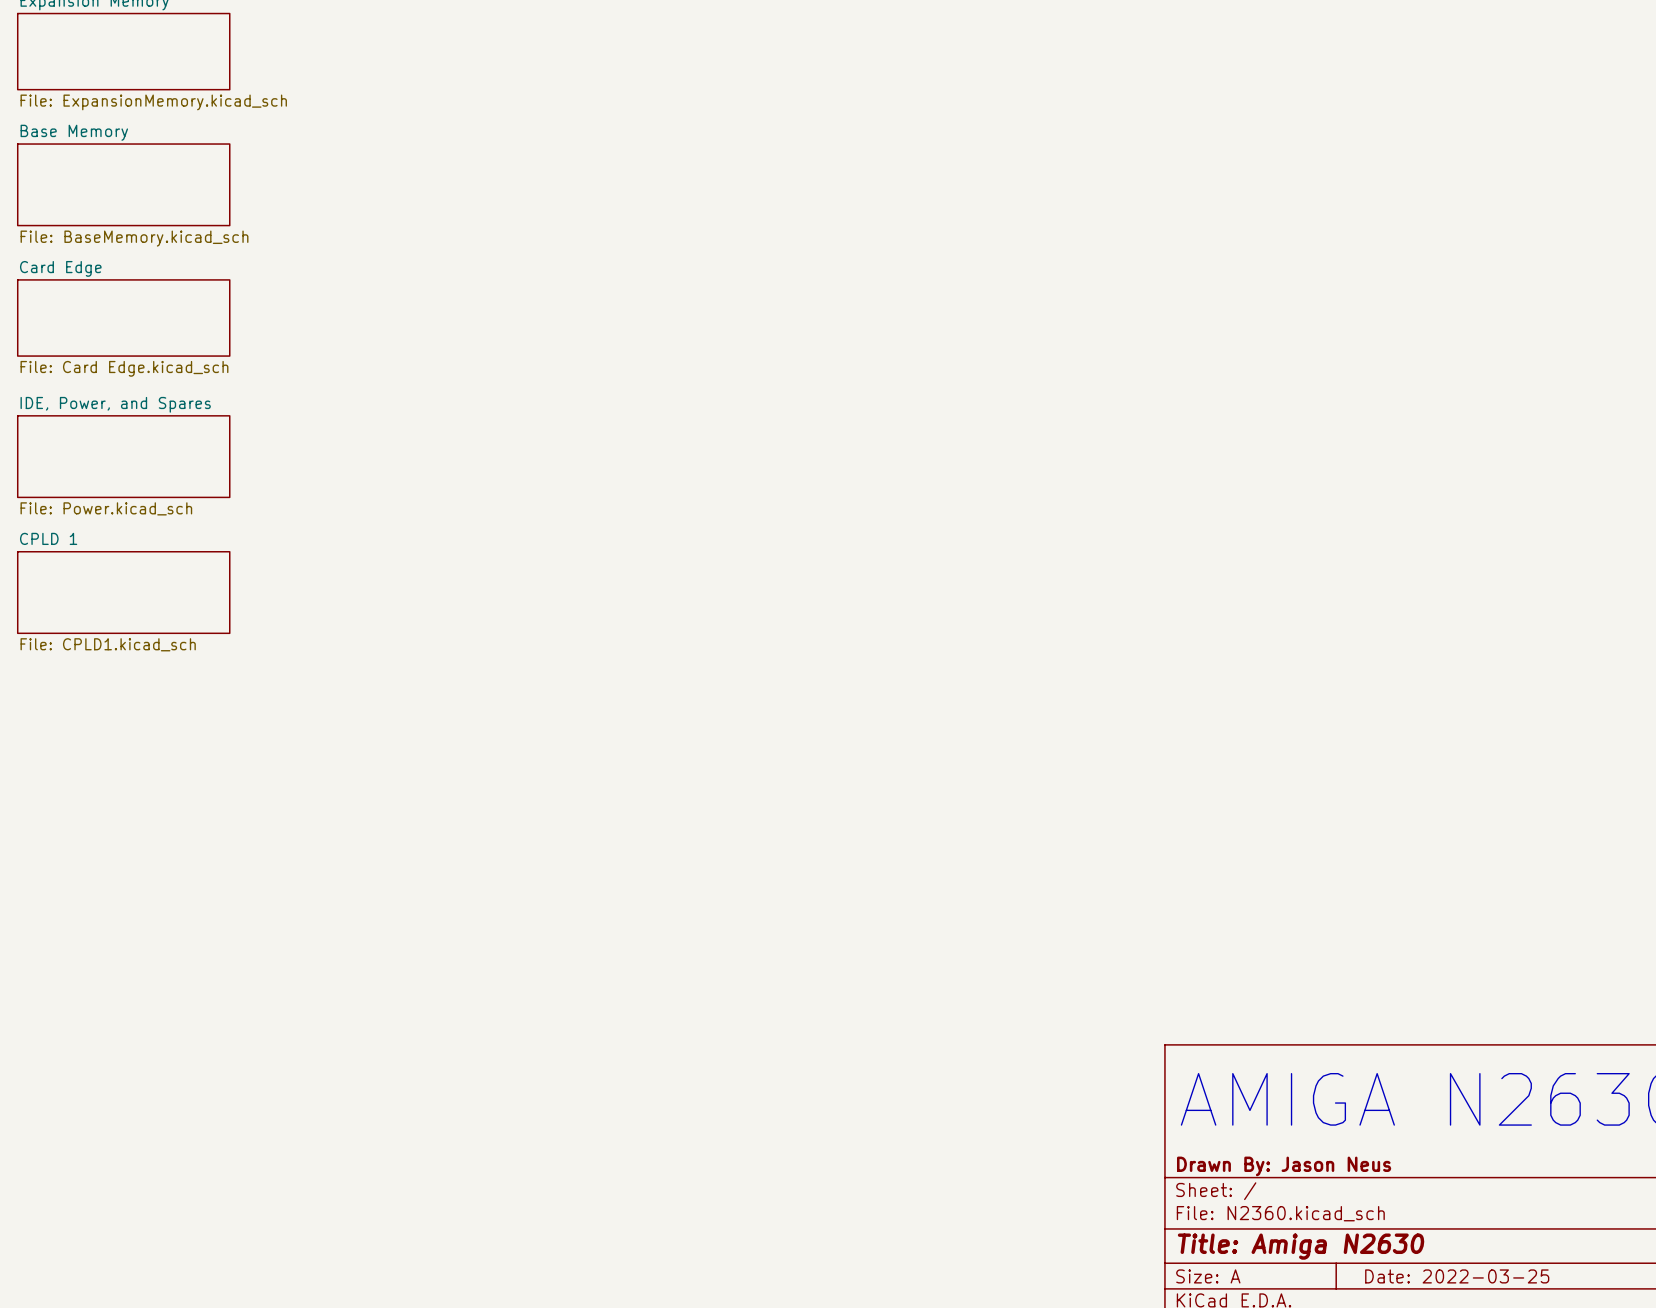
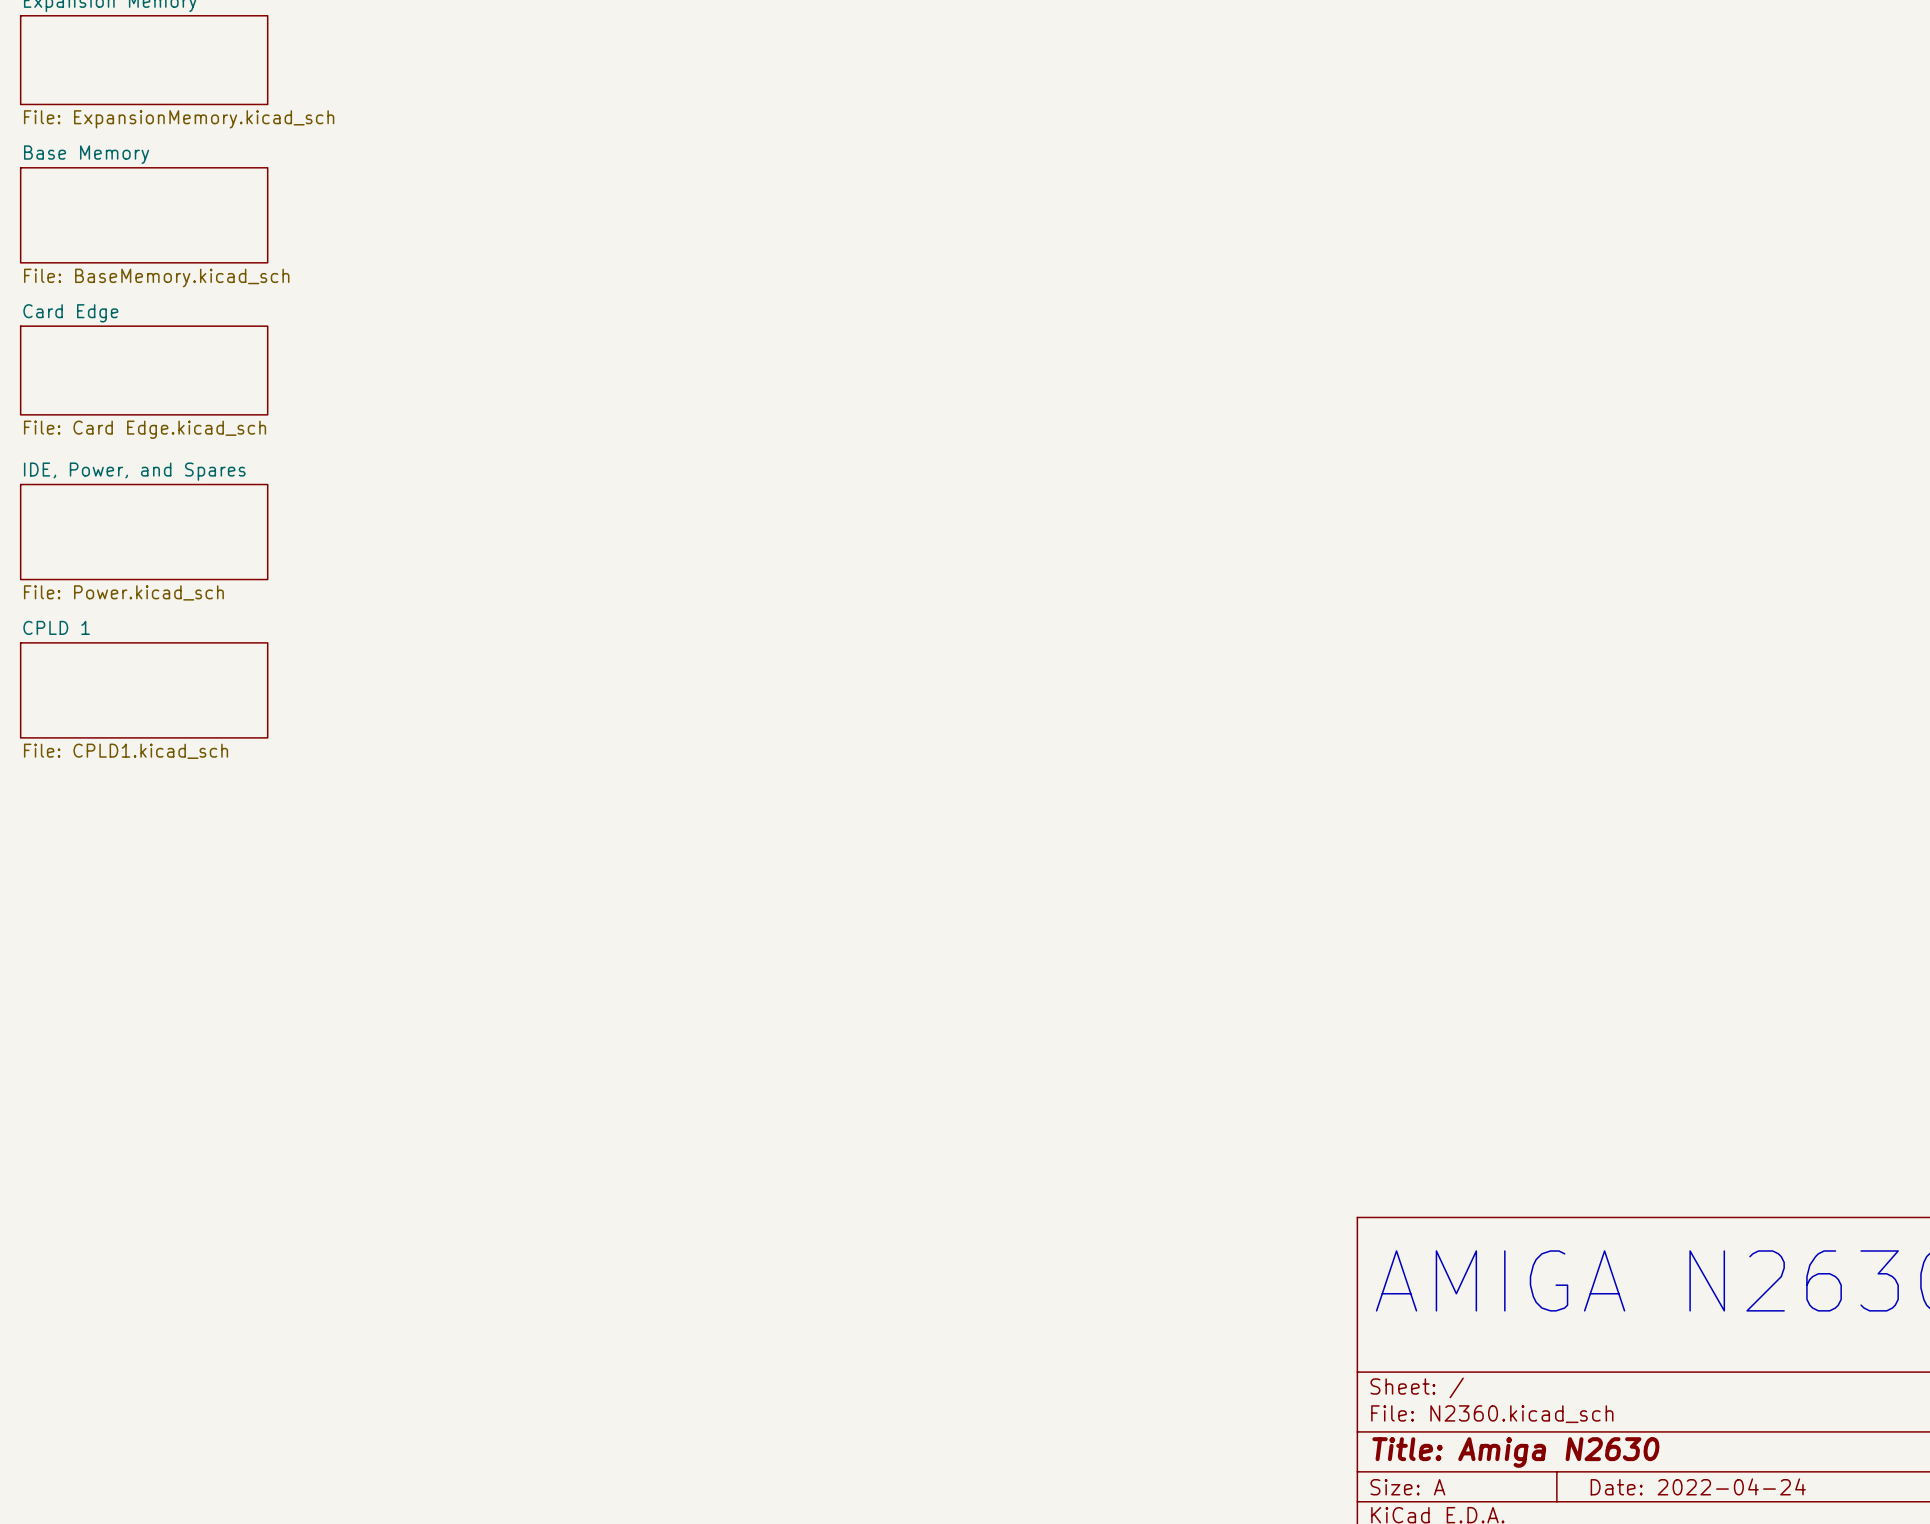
title block: Drawn By: Jason Neus (1284, 1166) -> none
title block: Date: 2022-03-25 (1457, 1276) -> Date: 2022-04-24 (1698, 1486)

